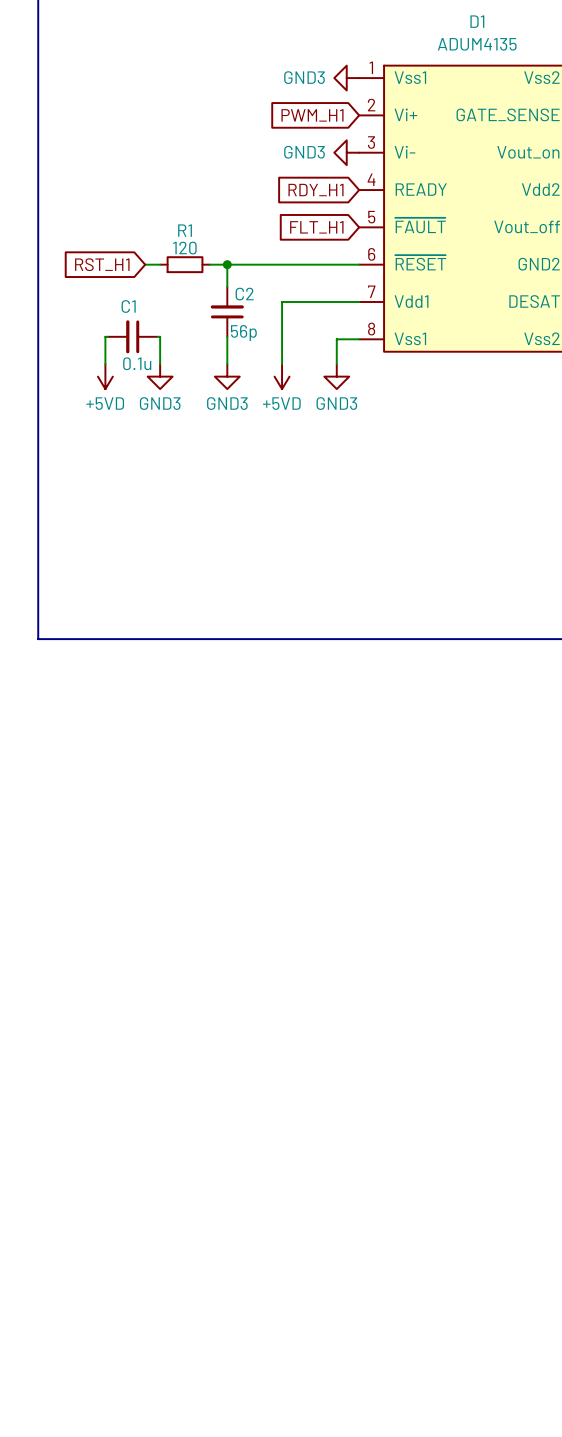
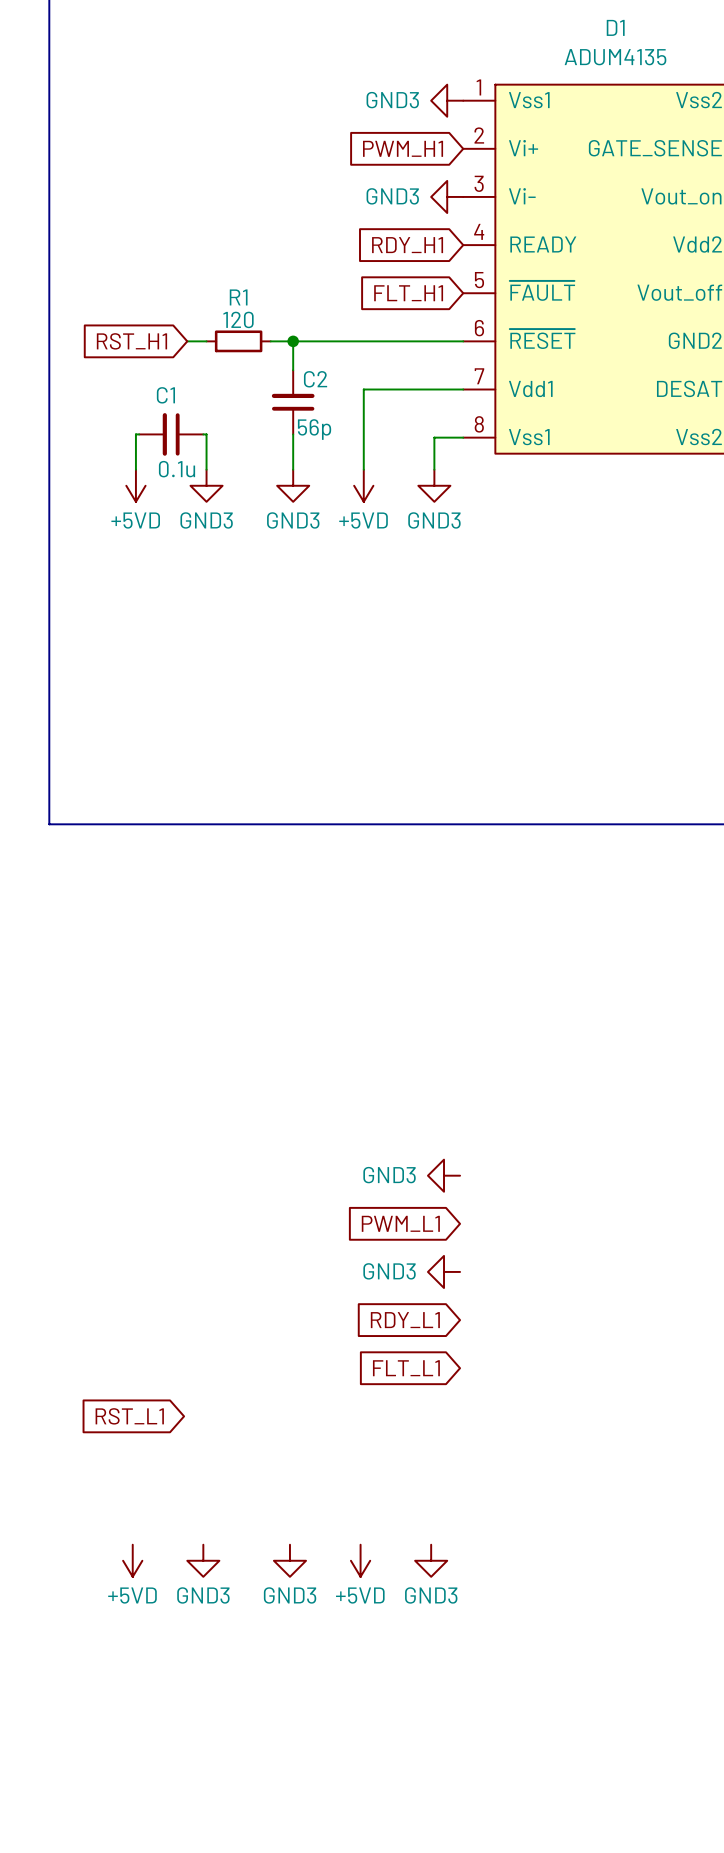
power symbol: none -> GND3 (444, 1175)
global label: none -> PWM_L1 (400, 1223)
power symbol: none -> GND3 (444, 1271)
global label: none -> RDY_L1 (405, 1320)
global label: none -> FLT_L1 (406, 1368)
global label: none -> RST_L1 (129, 1416)
power symbol: none -> +5VD (132, 1560)
power symbol: none -> GND3 (203, 1560)
power symbol: none -> GND3 (289, 1560)
power symbol: none -> +5VD (360, 1560)
power symbol: none -> GND3 (431, 1560)

